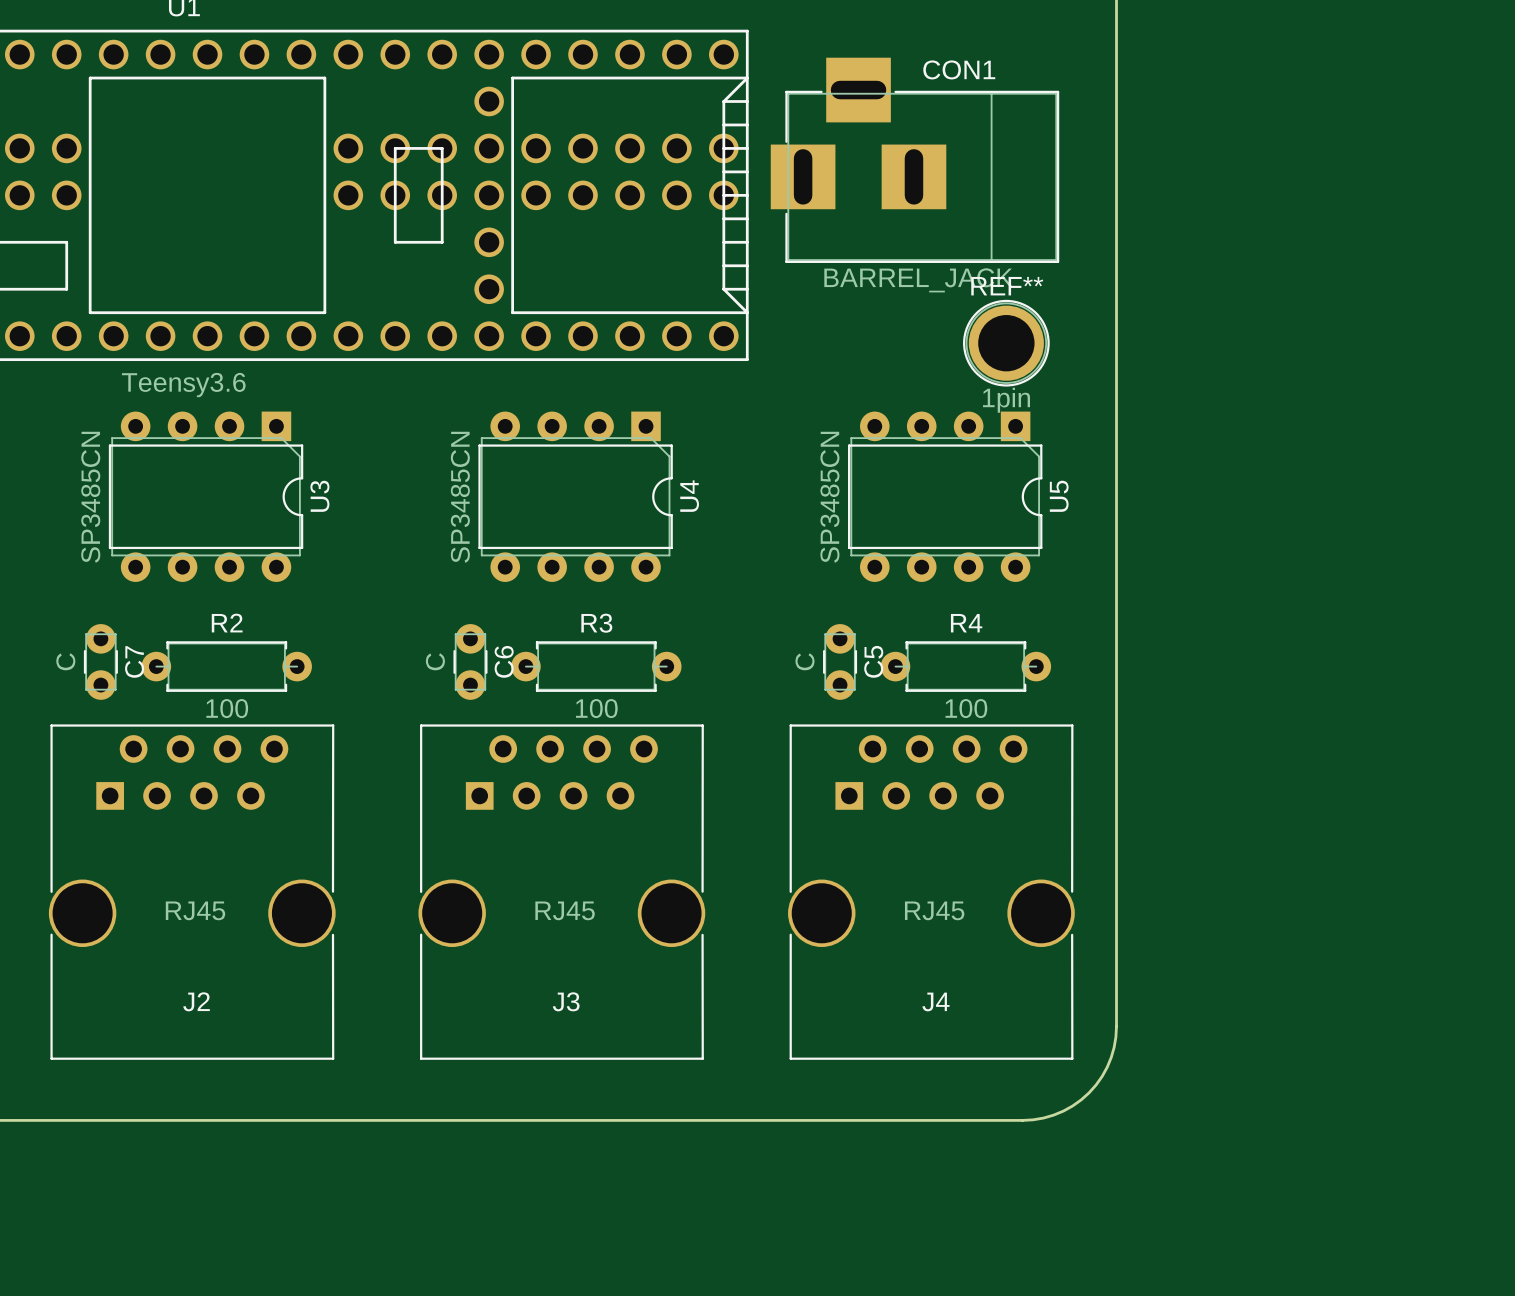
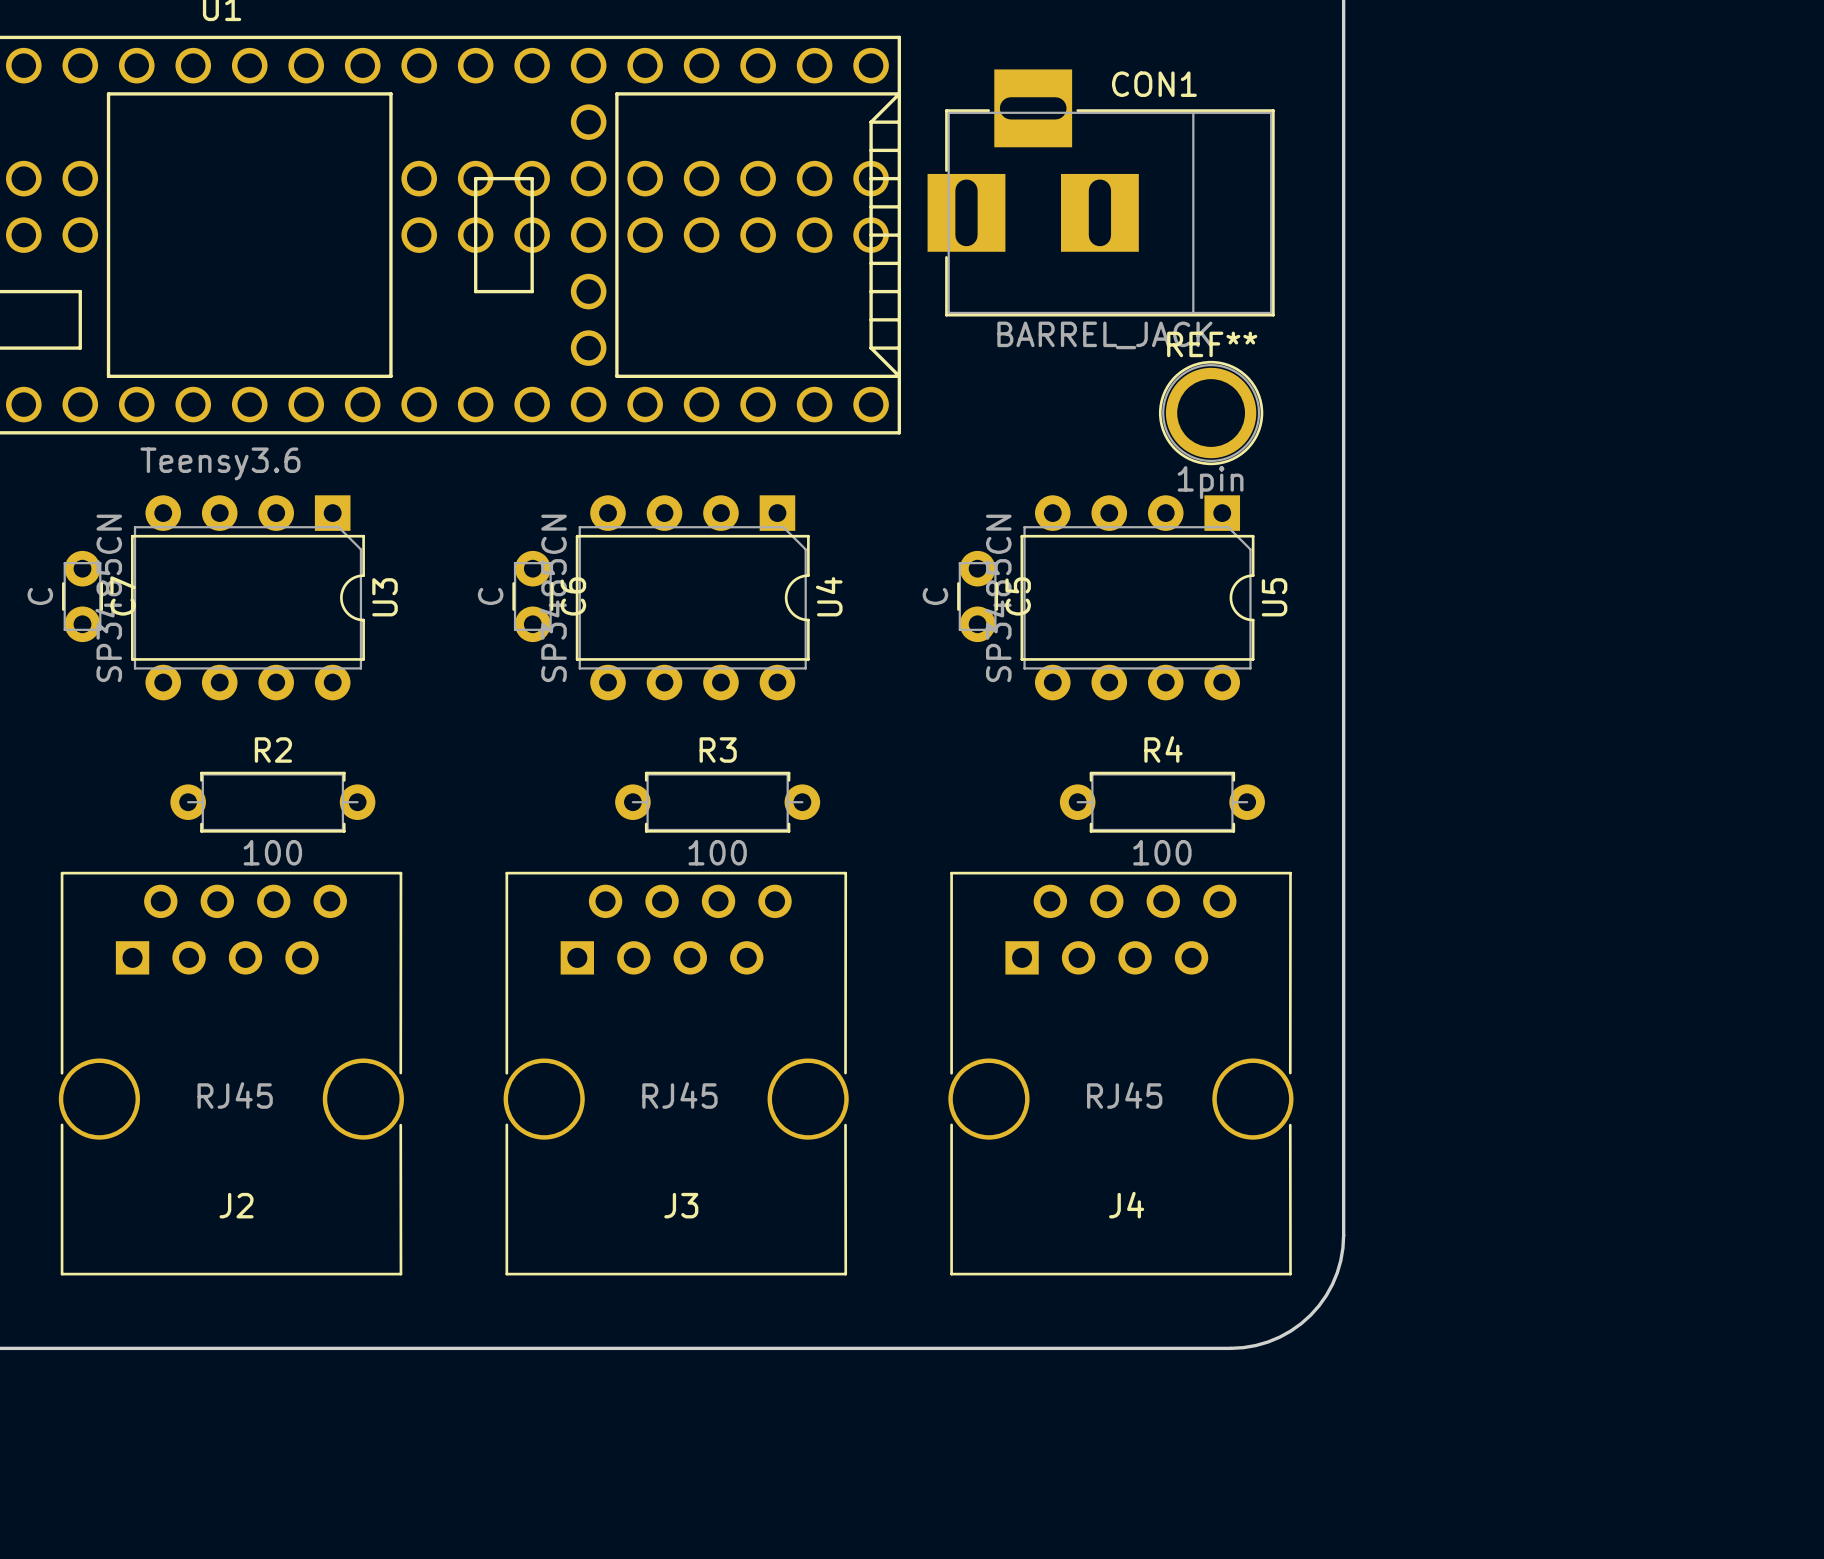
C7 position: (100, 661) -> (82, 596)
C6 position: (470, 661) -> (532, 596)
C5 position: (840, 661) -> (977, 596)

